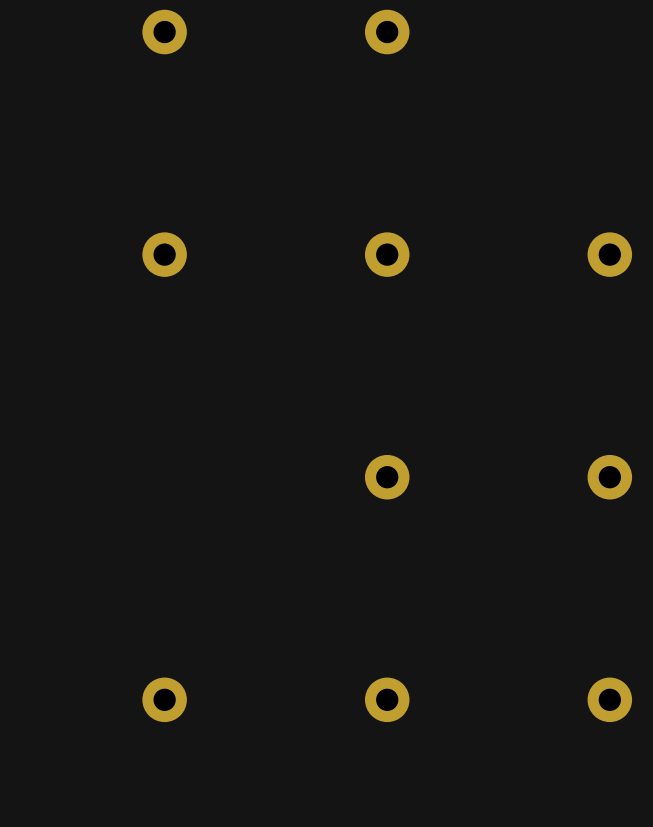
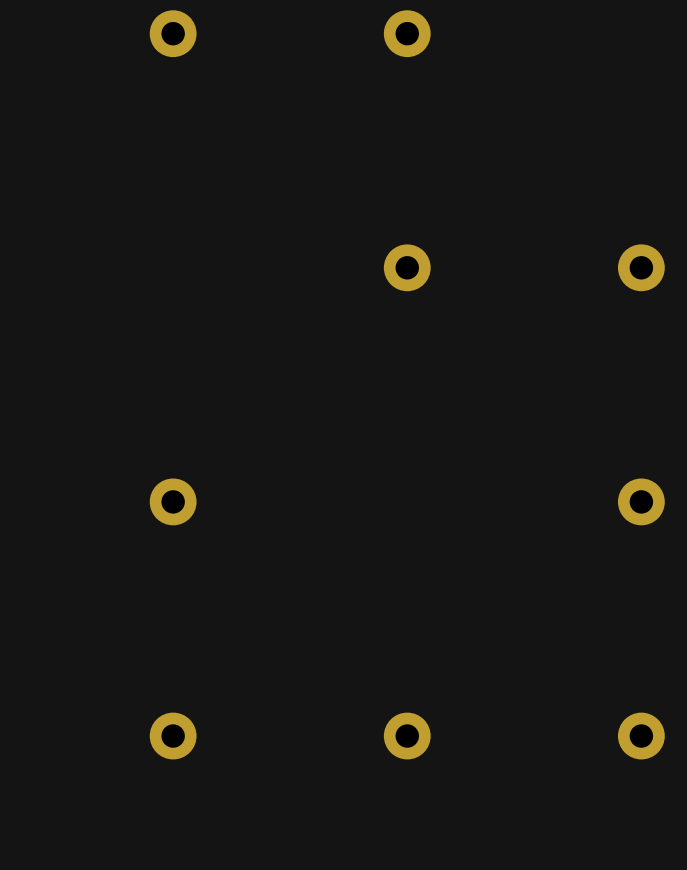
via: (164, 254) -> none
via: none -> (173, 501)
via: (387, 477) -> none

